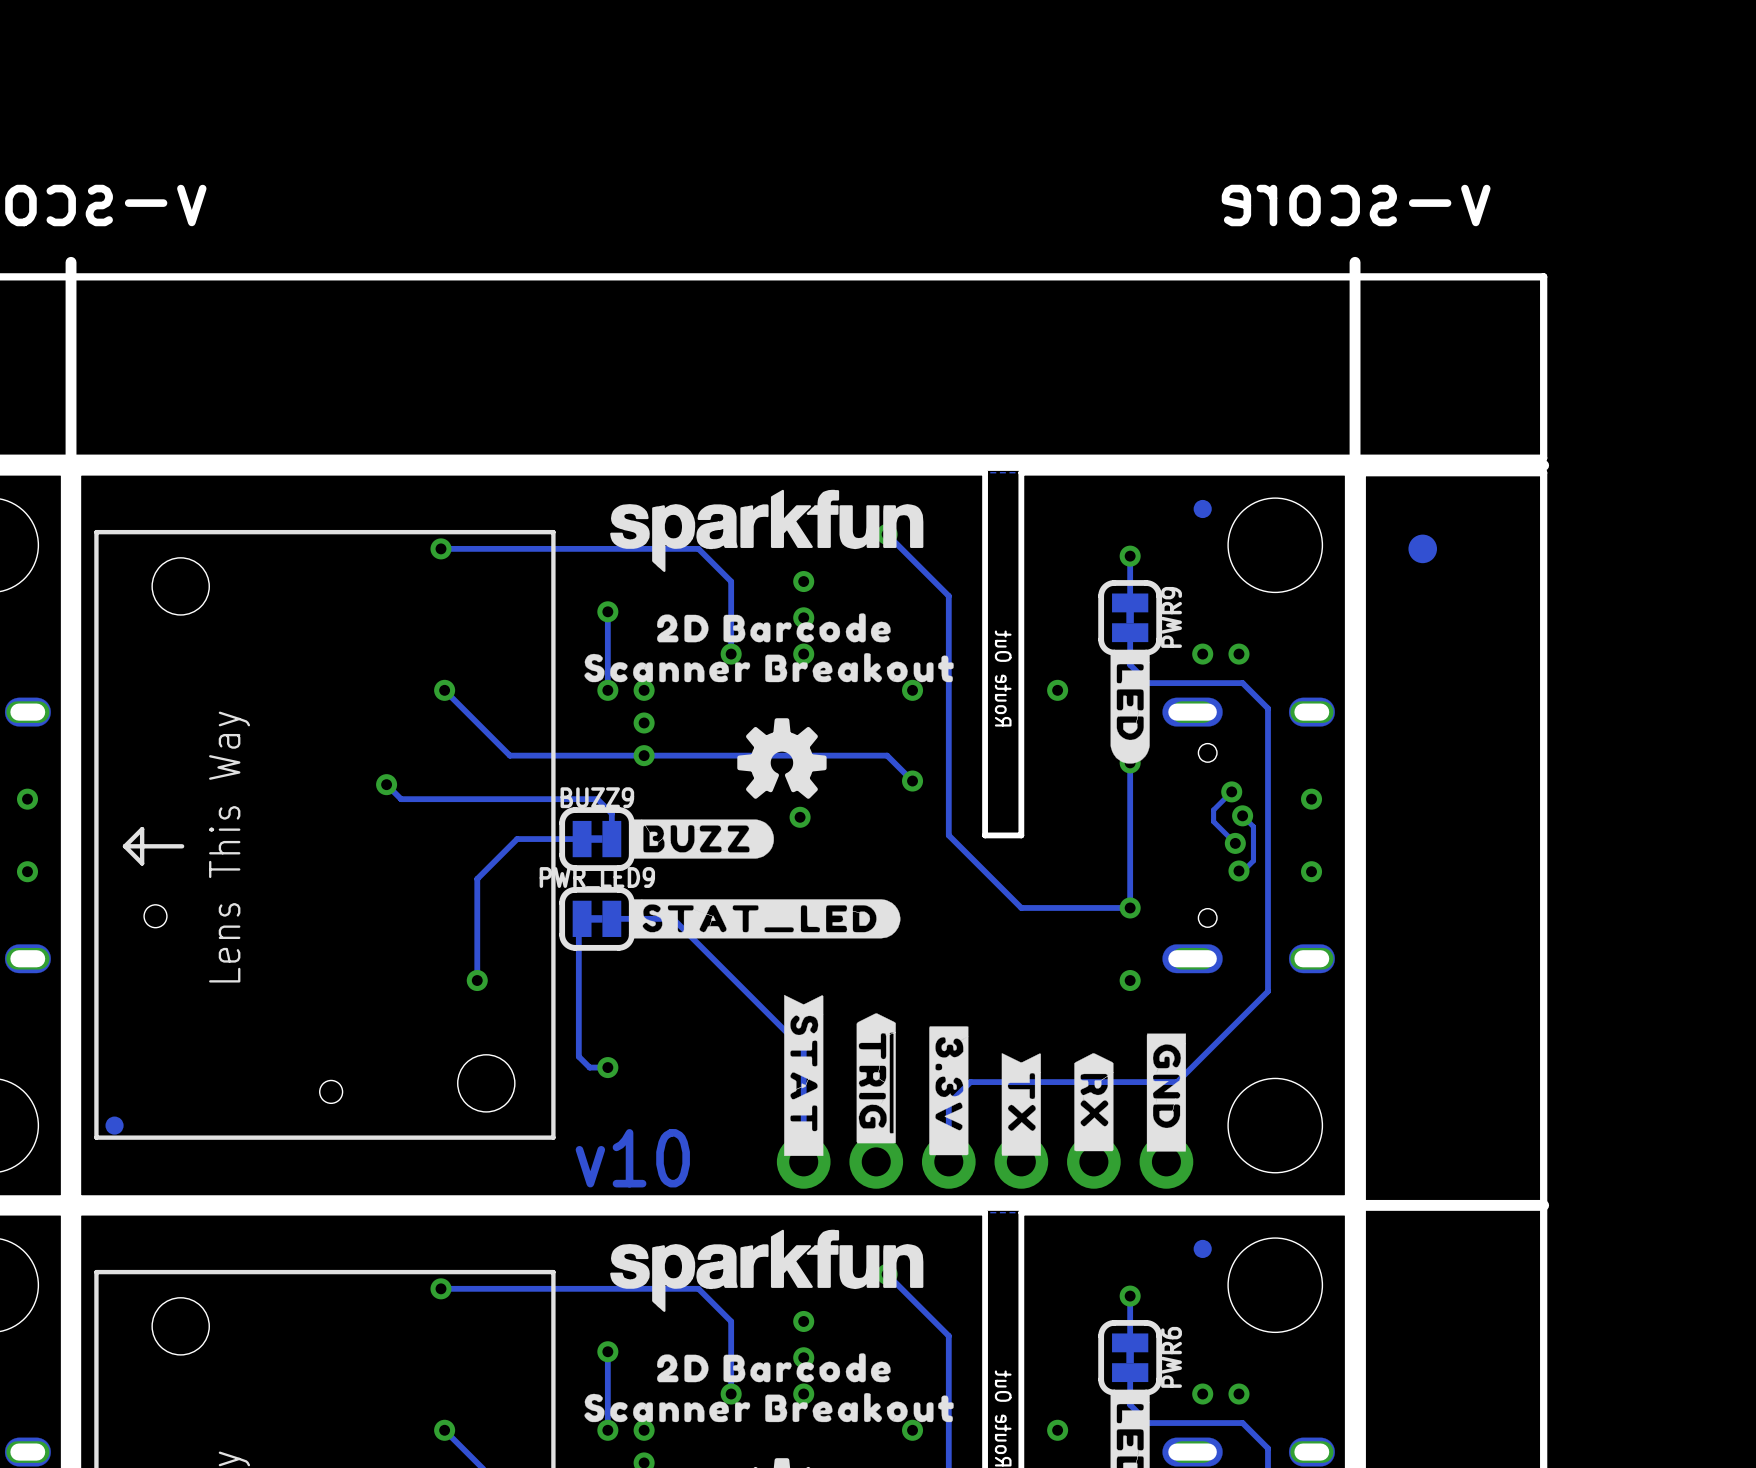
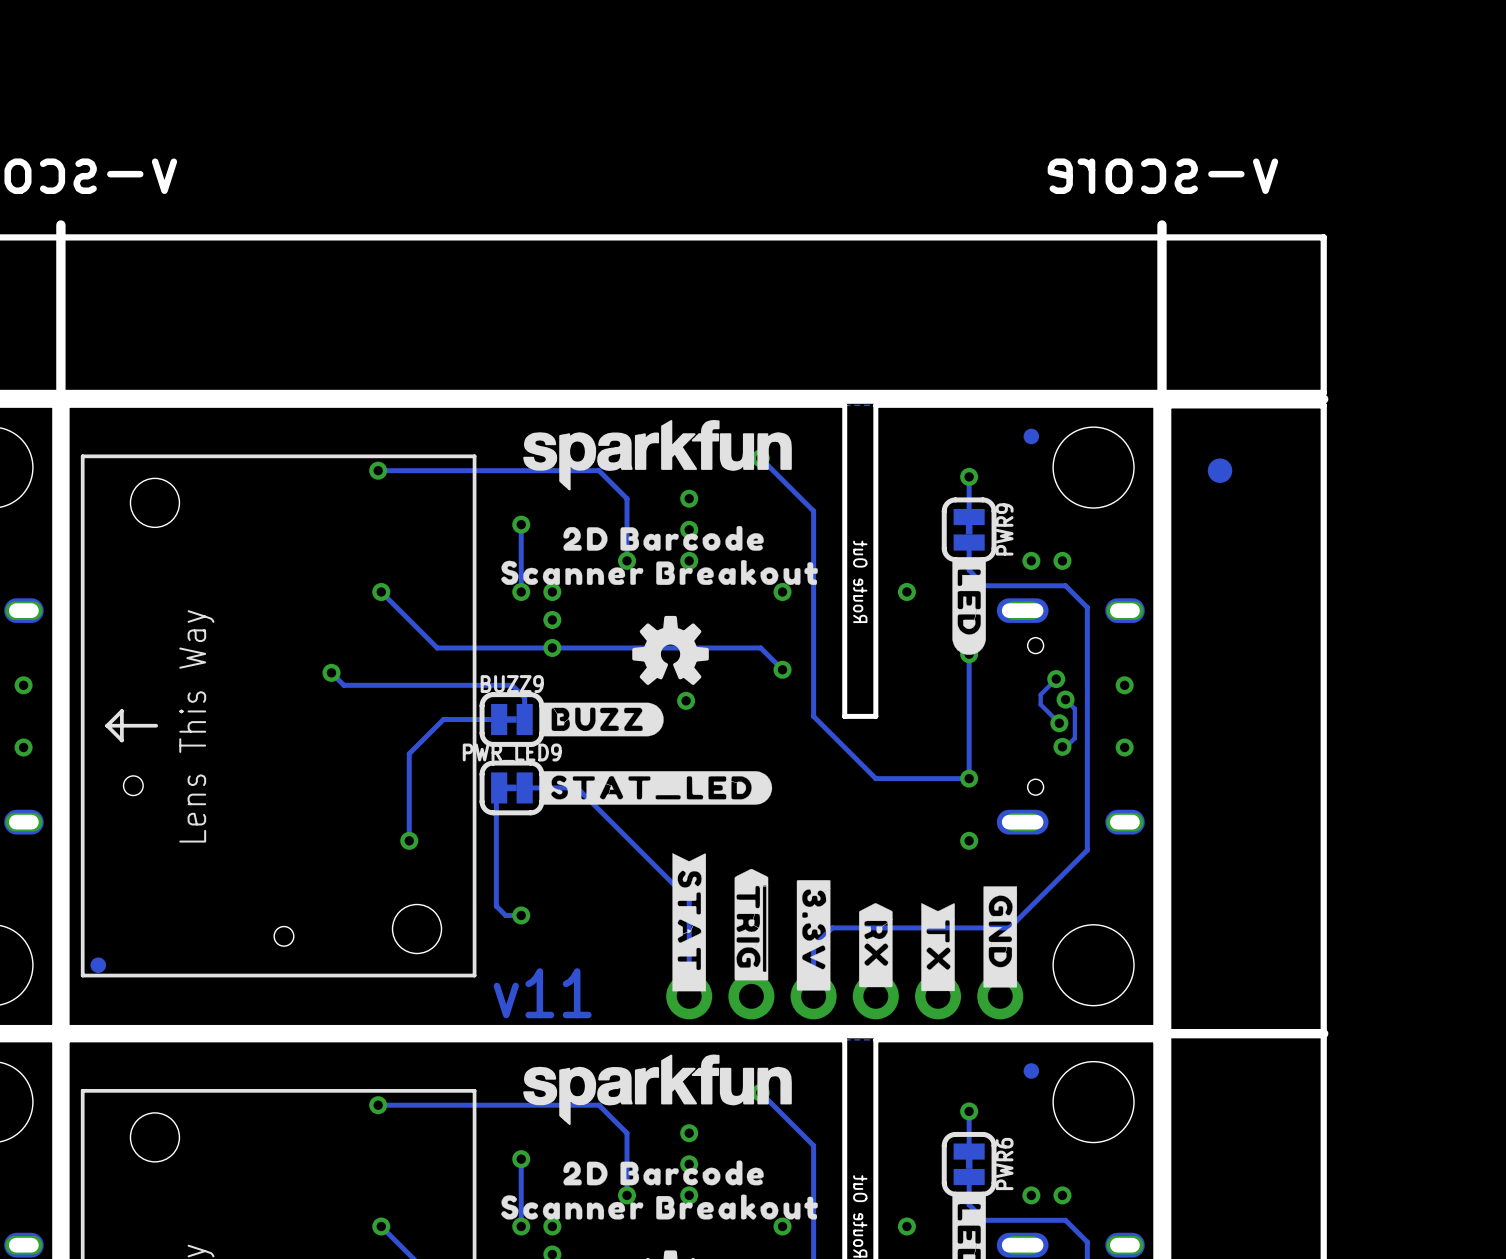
drawing position: (1093, 1102) -> (875, 945)
drawing position: (1021, 1104) -> (938, 947)
text: v10 (632, 1158) -> v11 (542, 993)

